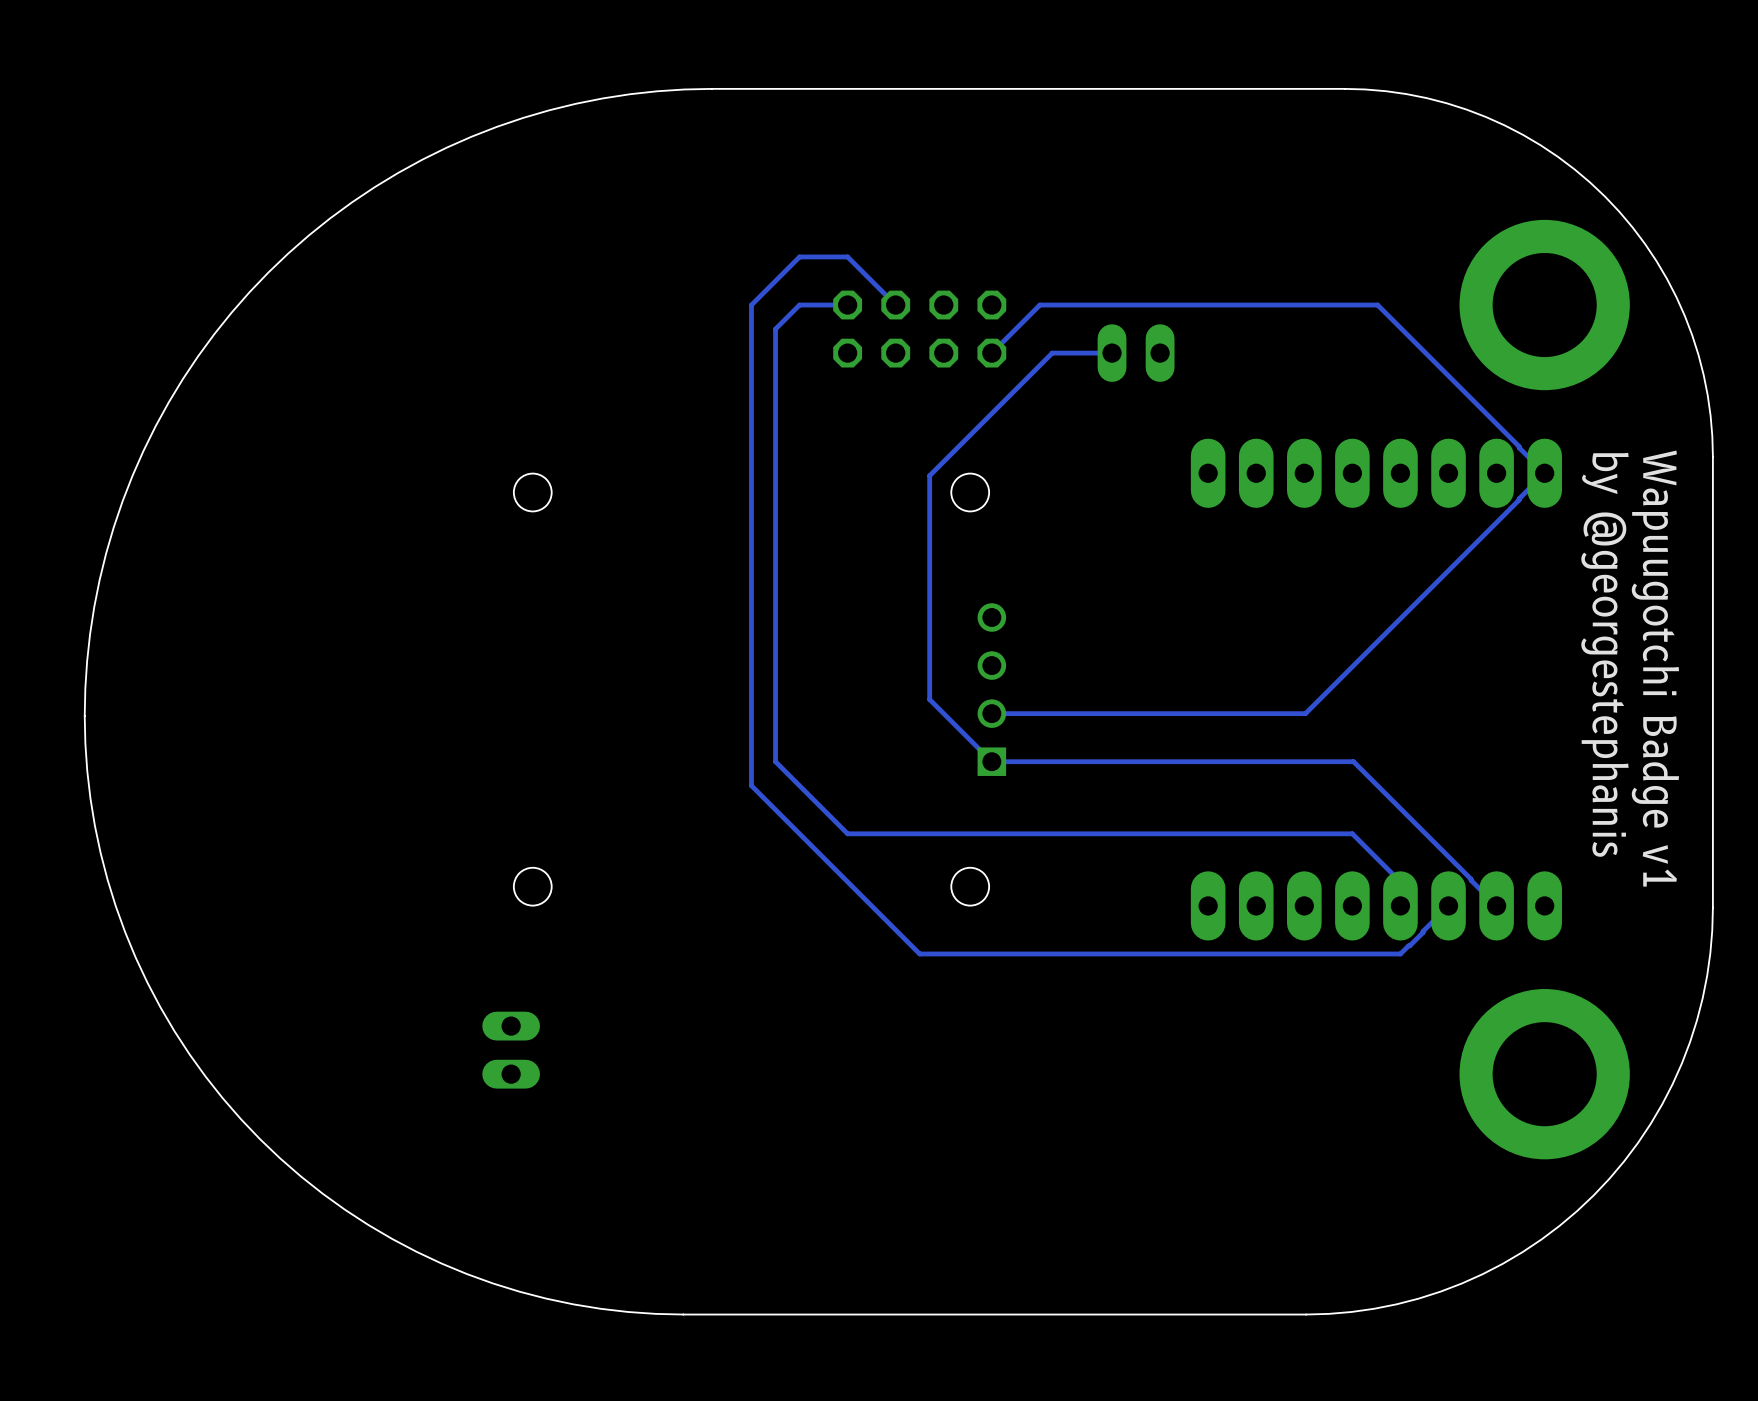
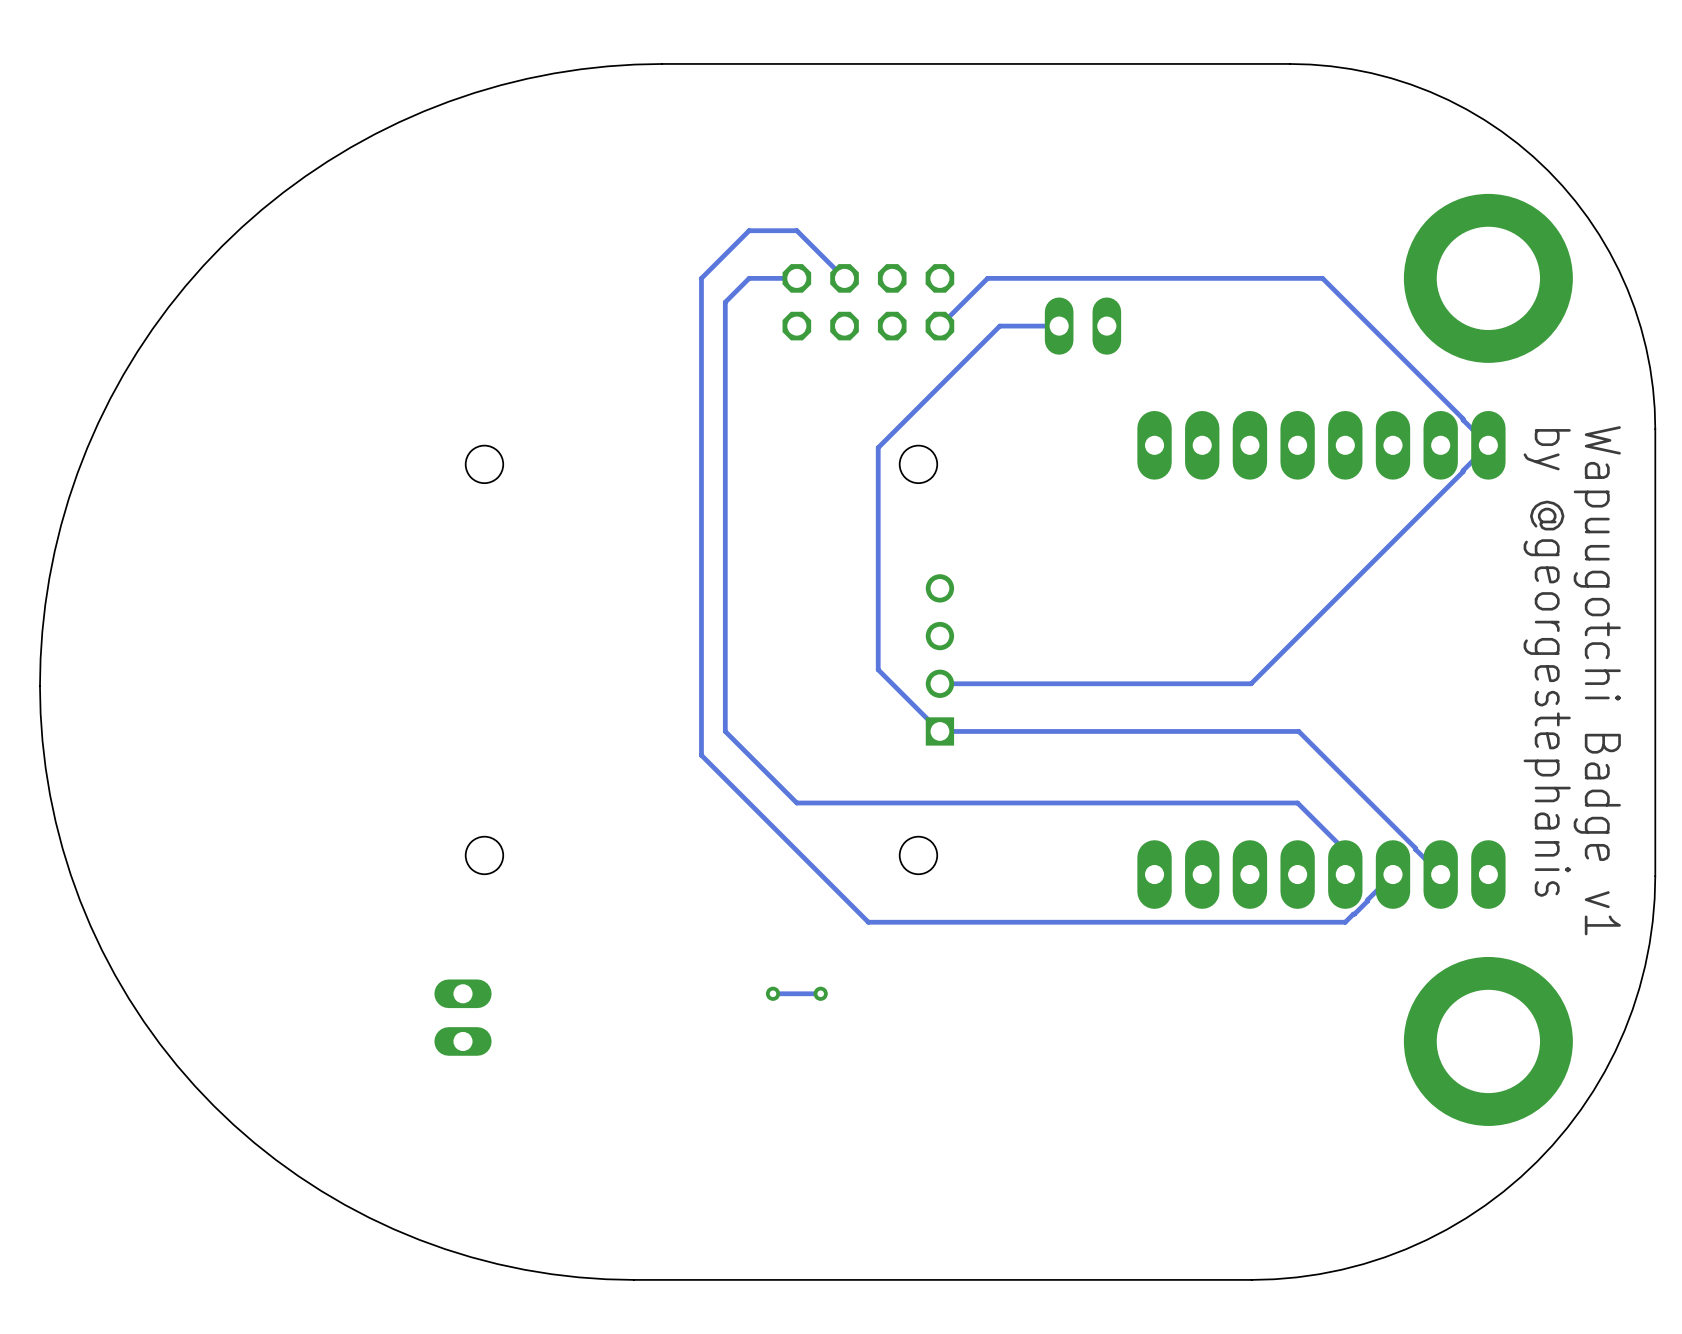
via: none -> (773, 993)
track: none -> (820, 993) (773, 993)
via: none -> (820, 993)

